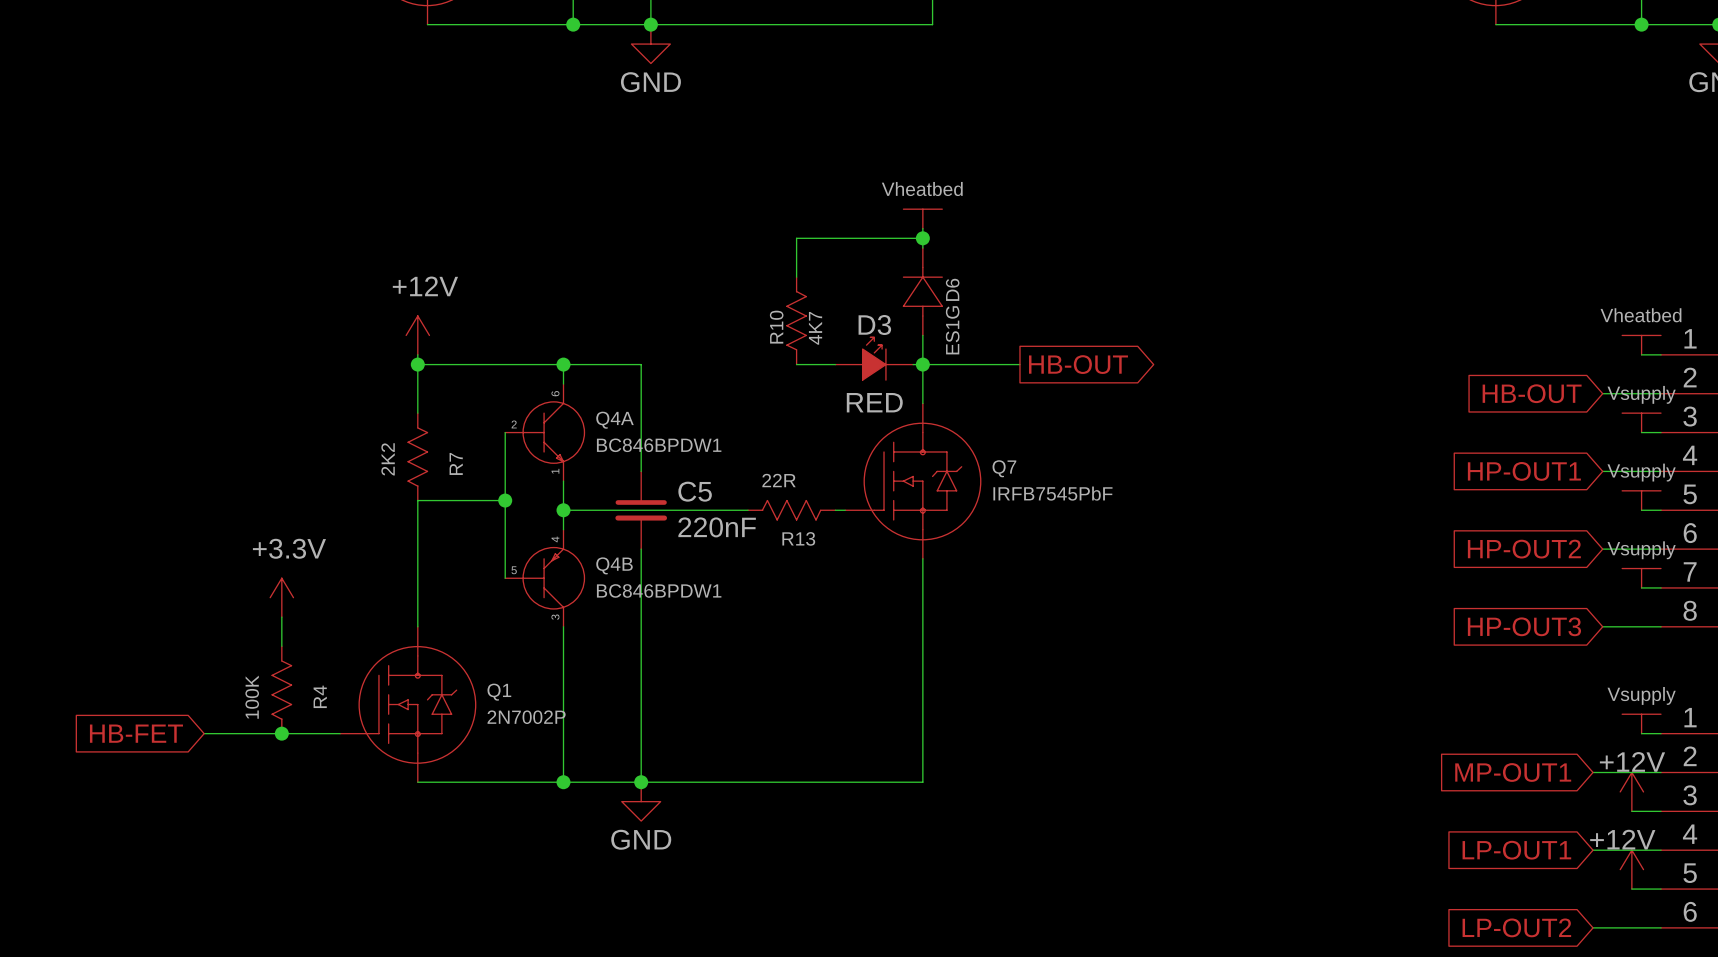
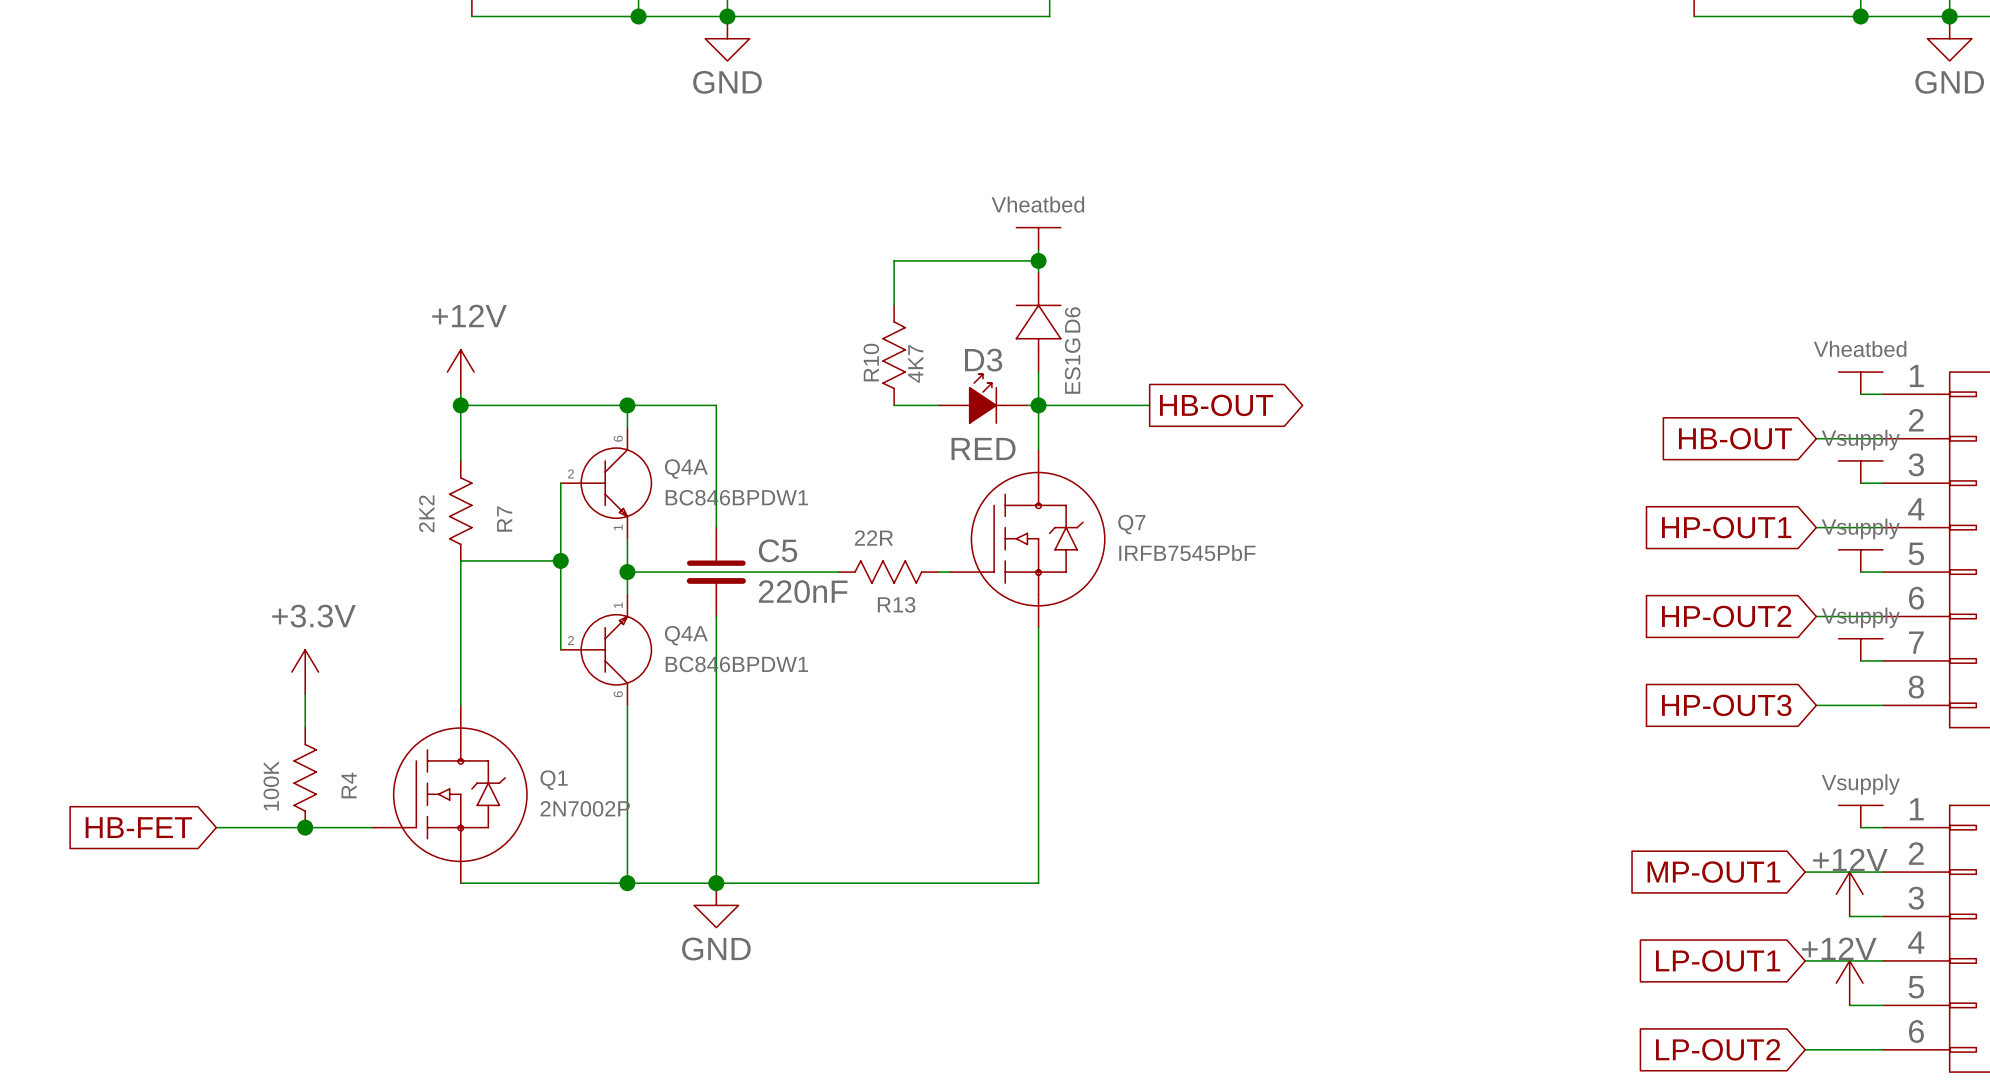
Q4B: BC846BPDW1 (544, 578) -> none
Q4A: none -> BC846BPDW1 (606, 649)

